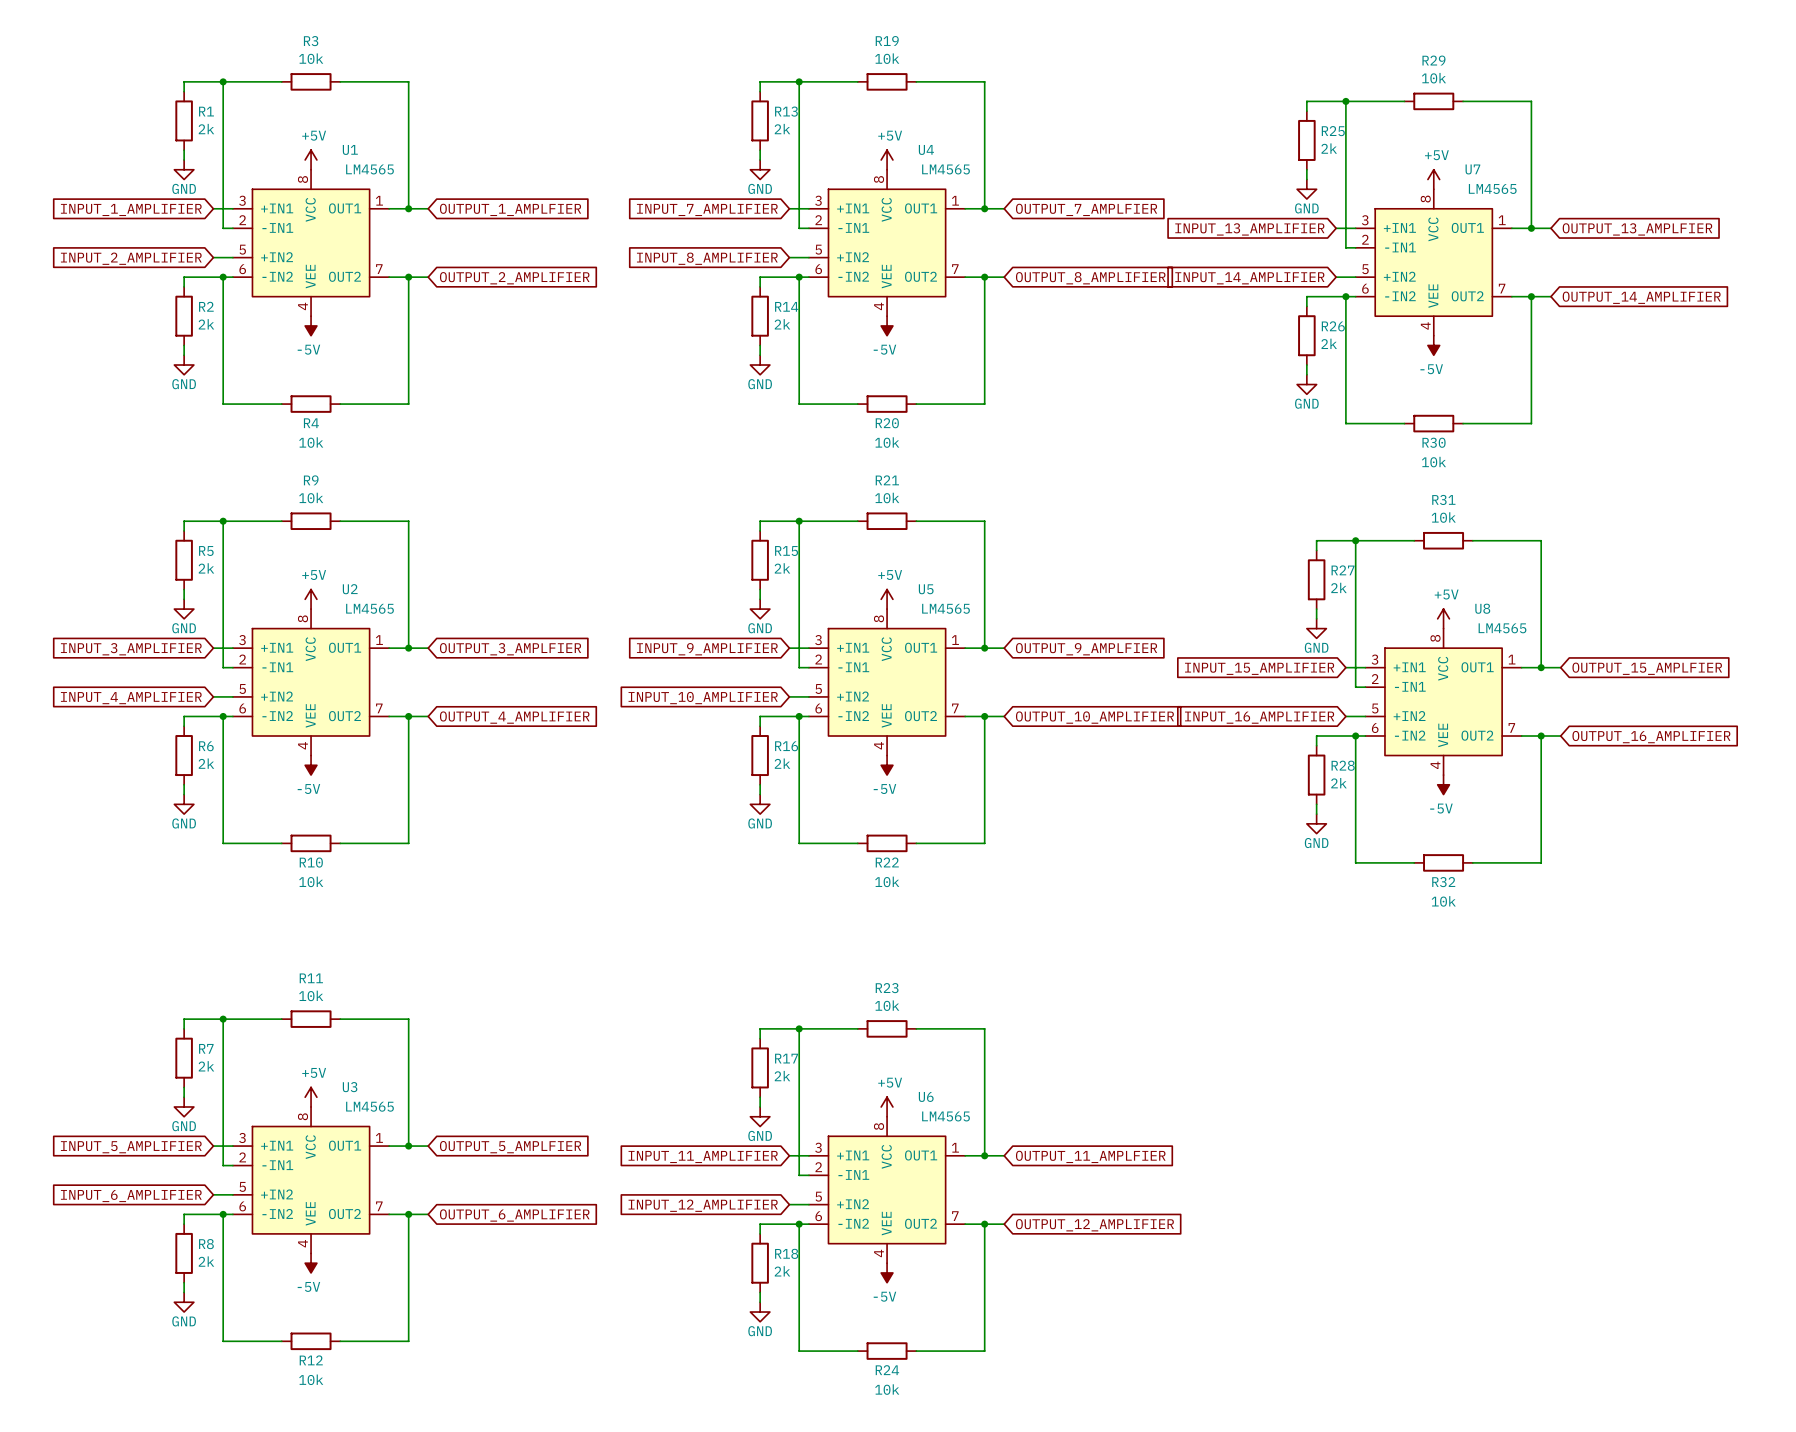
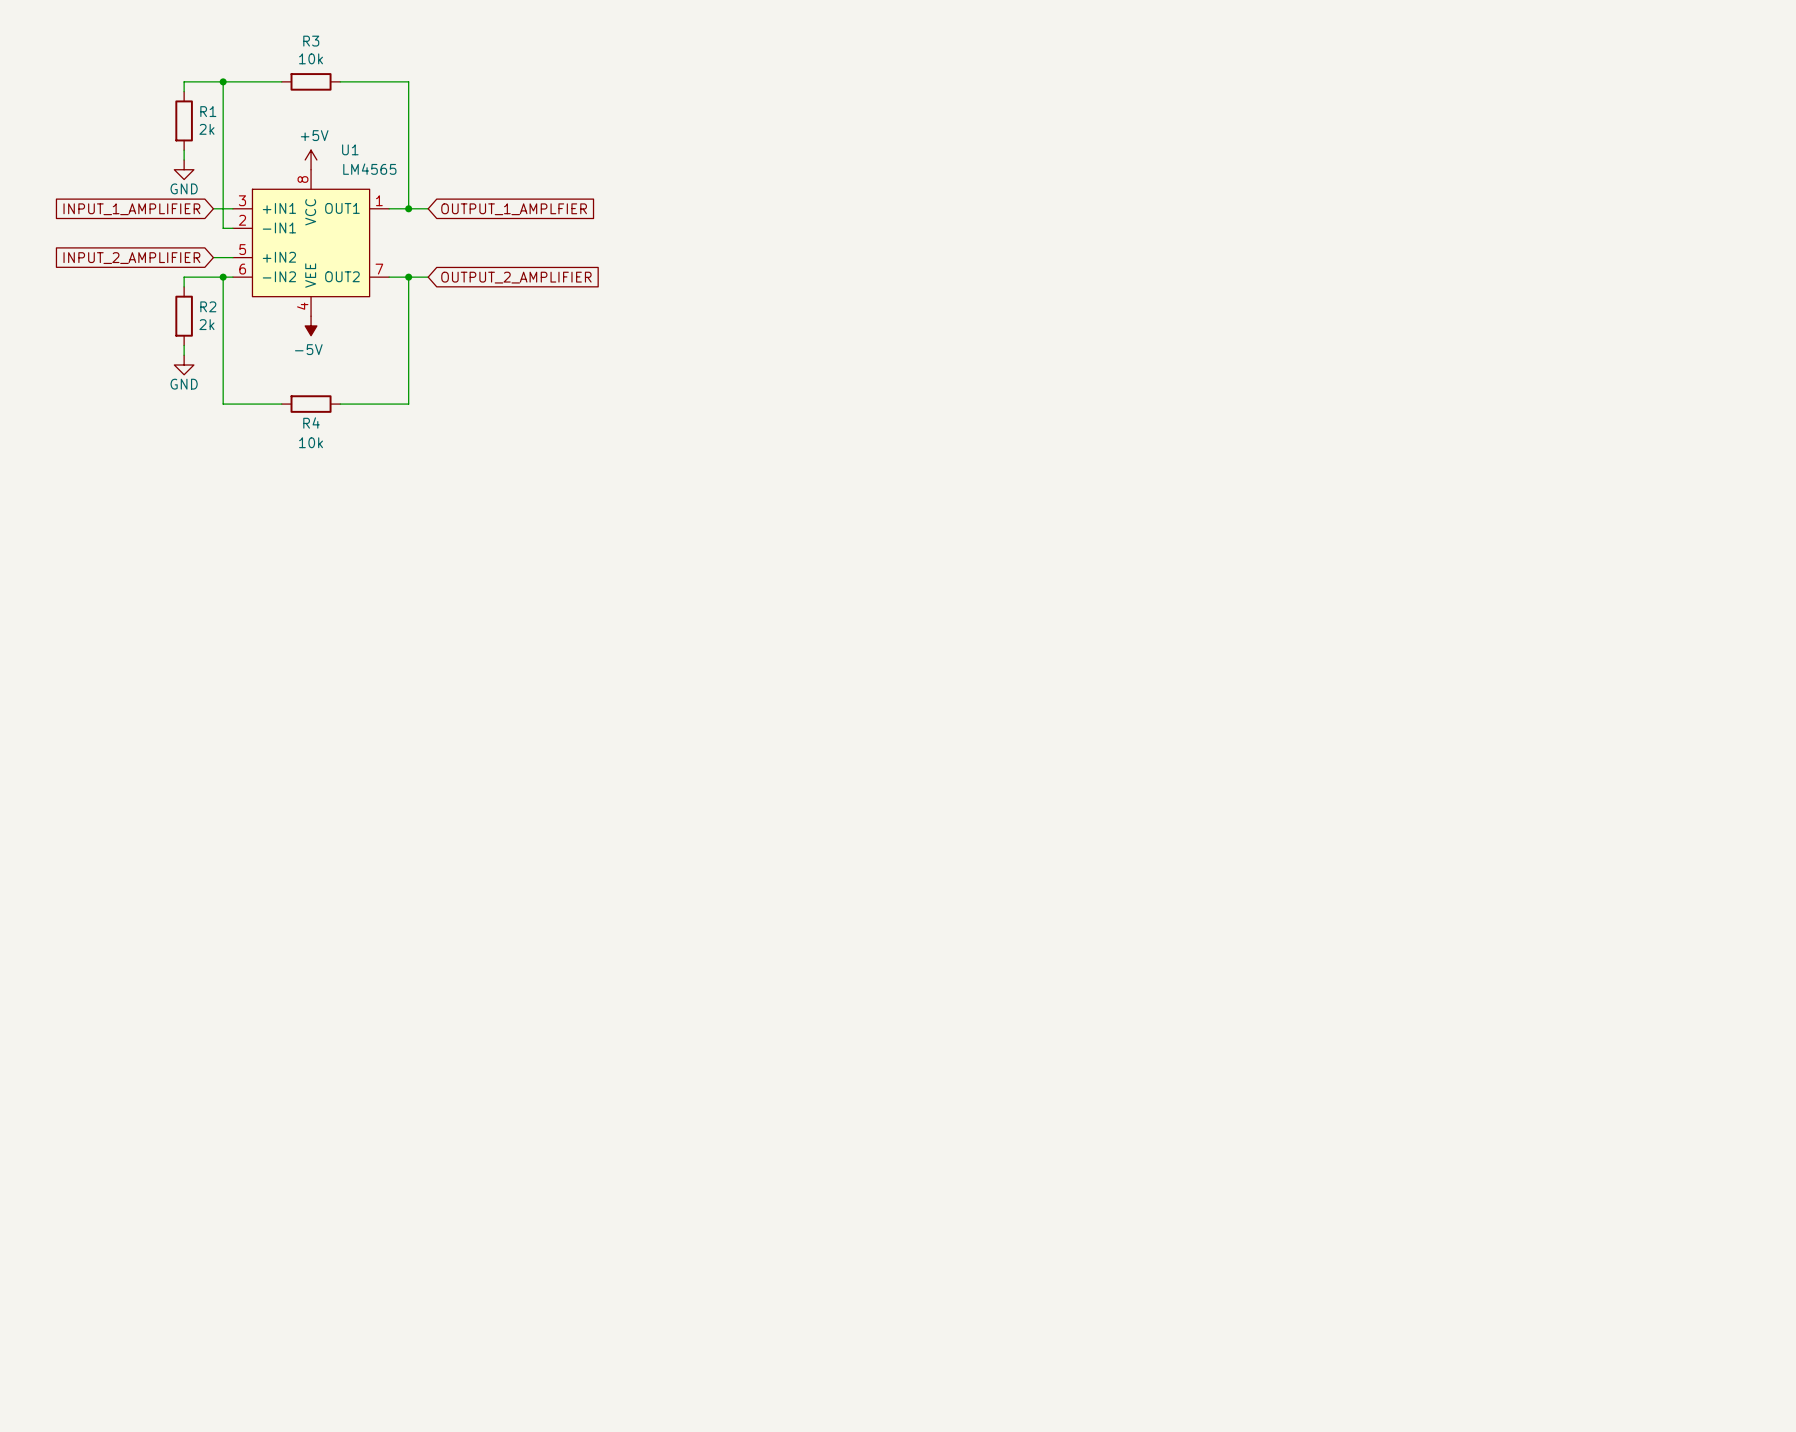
wire: (799, 81) (799, 228) (808, 228) -> none
junction: (799, 81) -> none
wire: (857, 81) (760, 81) (760, 91) -> none
R19: 10k (887, 81) -> none
wire: (916, 81) (984, 81) (984, 208) -> none
wire: (1345, 101) (1345, 247) (1355, 247) -> none
junction: (1345, 101) -> none
wire: (1404, 101) (1306, 101) (1306, 111) -> none
R29: 10k (1433, 101) -> none
wire: (1463, 101) (1531, 101) (1531, 228) -> none
R13: 2k (760, 120) -> none
R25: 2k (1306, 140) -> none
wire: (760, 150) (760, 159) -> none
power symbol: +5V (887, 159) -> none
power symbol: GND (760, 169) -> none
wire: (1306, 169) (1306, 179) -> none
power symbol: +5V (1433, 179) -> none
power symbol: GND (1306, 189) -> none
wire: (789, 208) (808, 208) -> none
wire: (965, 208) (1004, 208) -> none
junction: (984, 208) -> none
global label: INPUT_7_AMPLIFIER (707, 209) -> none
global label: OUTPUT_7_AMPLFIER (1086, 209) -> none
wire: (1336, 228) (1355, 228) -> none
wire: (1511, 228) (1550, 228) -> none
junction: (1531, 228) -> none
global label: INPUT_13_AMPLIFIER (1249, 229) -> none
global label: OUTPUT_13_AMPLFIER (1637, 229) -> none
U4: LM4565 (887, 242) -> none
wire: (789, 257) (808, 257) -> none
global label: INPUT_8_AMPLIFIER (707, 258) -> none
U7: LM4565 (1433, 262) -> none
wire: (799, 277) (799, 404) (857, 404) -> none
junction: (799, 277) -> none
wire: (808, 277) (760, 277) (760, 286) -> none
wire: (965, 277) (1004, 277) -> none
wire: (984, 277) (984, 404) (916, 404) -> none
junction: (984, 277) -> none
wire: (1336, 277) (1355, 277) -> none
global label: OUTPUT_8_AMPLIFIER (1090, 278) -> none
global label: INPUT_14_AMPLIFIER (1249, 278) -> none
wire: (1345, 296) (1345, 423) (1404, 423) -> none
junction: (1345, 296) -> none
wire: (1355, 296) (1306, 296) (1306, 306) -> none
wire: (1511, 296) (1550, 296) -> none
wire: (1531, 296) (1531, 423) (1463, 423) -> none
junction: (1531, 296) -> none
global label: OUTPUT_14_AMPLIFIER (1641, 297) -> none
R14: 2k (760, 316) -> none
power symbol: -5V (887, 325) -> none
R26: 2k (1306, 335) -> none
wire: (760, 345) (760, 355) -> none
power symbol: -5V (1433, 345) -> none
power symbol: GND (760, 365) -> none
wire: (1306, 365) (1306, 374) -> none
power symbol: GND (1306, 384) -> none
R20: 10k (887, 404) -> none
R30: 10k (1433, 423) -> none
wire: (223, 521) (223, 667) (232, 667) -> none
junction: (223, 521) -> none
wire: (281, 521) (184, 521) (184, 530) -> none
R9: 10k (311, 521) -> none
wire: (340, 521) (408, 521) (408, 648) -> none
wire: (799, 521) (799, 667) (808, 667) -> none
junction: (799, 521) -> none
wire: (857, 521) (760, 521) (760, 530) -> none
R21: 10k (887, 521) -> none
wire: (916, 521) (984, 521) (984, 648) -> none
wire: (1355, 540) (1355, 687) (1365, 687) -> none
junction: (1355, 540) -> none
wire: (1414, 540) (1316, 540) (1316, 550) -> none
R31: 10k (1443, 540) -> none
wire: (1472, 540) (1541, 540) (1541, 667) -> none
R5: 2k (184, 560) -> none
R15: 2k (760, 560) -> none
R27: 2k (1316, 579) -> none
wire: (184, 589) (184, 599) -> none
wire: (760, 589) (760, 599) -> none
power symbol: +5V (311, 599) -> none
power symbol: +5V (887, 599) -> none
power symbol: GND (184, 609) -> none
power symbol: GND (760, 609) -> none
wire: (1316, 609) (1316, 618) -> none
power symbol: +5V (1443, 618) -> none
power symbol: GND (1316, 628) -> none
wire: (213, 648) (232, 648) -> none
wire: (389, 648) (428, 648) -> none
junction: (408, 648) -> none
wire: (789, 648) (808, 648) -> none
wire: (965, 648) (1004, 648) -> none
junction: (984, 648) -> none
global label: INPUT_3_AMPLIFIER (131, 649) -> none
global label: OUTPUT_3_AMPLFIER (510, 649) -> none
global label: INPUT_9_AMPLIFIER (707, 649) -> none
global label: OUTPUT_9_AMPLFIER (1086, 649) -> none
wire: (1345, 667) (1365, 667) -> none
wire: (1521, 667) (1560, 667) -> none
junction: (1541, 667) -> none
global label: INPUT_15_AMPLIFIER (1259, 668) -> none
global label: OUTPUT_15_AMPLFIER (1647, 668) -> none
U2: LM4565 (311, 682) -> none
U5: LM4565 (887, 682) -> none
wire: (213, 696) (232, 696) -> none
wire: (789, 696) (808, 696) -> none
global label: INPUT_4_AMPLIFIER (131, 698) -> none
global label: INPUT_10_AMPLIFIER (703, 698) -> none
U8: LM4565 (1443, 701) -> none
wire: (223, 716) (223, 843) (281, 843) -> none
junction: (223, 716) -> none
wire: (232, 716) (184, 716) (184, 726) -> none
wire: (389, 716) (428, 716) -> none
wire: (408, 716) (408, 843) (340, 843) -> none
junction: (408, 716) -> none
wire: (799, 716) (799, 843) (857, 843) -> none
junction: (799, 716) -> none
wire: (808, 716) (760, 716) (760, 726) -> none
wire: (965, 716) (1004, 716) -> none
wire: (984, 716) (984, 843) (916, 843) -> none
junction: (984, 716) -> none
wire: (1345, 716) (1365, 716) -> none
global label: OUTPUT_4_AMPLIFIER (514, 717) -> none
global label: OUTPUT_10_AMPLIFIER (1094, 717) -> none
global label: INPUT_16_AMPLIFIER (1259, 717) -> none
wire: (1355, 736) (1355, 862) (1414, 862) -> none
junction: (1355, 736) -> none
wire: (1365, 736) (1316, 736) (1316, 745) -> none
wire: (1521, 736) (1560, 736) -> none
wire: (1541, 736) (1541, 862) (1472, 862) -> none
junction: (1541, 736) -> none
global label: OUTPUT_16_AMPLIFIER (1651, 737) -> none
R6: 2k (184, 755) -> none
R16: 2k (760, 755) -> none
power symbol: -5V (311, 765) -> none
power symbol: -5V (887, 765) -> none
R28: 2k (1316, 775) -> none
wire: (184, 784) (184, 794) -> none
wire: (760, 784) (760, 794) -> none
power symbol: -5V (1443, 784) -> none
power symbol: GND (184, 804) -> none
power symbol: GND (760, 804) -> none
wire: (1316, 804) (1316, 814) -> none
power symbol: GND (1316, 823) -> none
R10: 10k (311, 843) -> none
R22: 10k (887, 843) -> none
R32: 10k (1443, 862) -> none
wire: (223, 1019) (223, 1165) (232, 1165) -> none
junction: (223, 1019) -> none
wire: (281, 1019) (184, 1019) (184, 1028) -> none
R11: 10k (311, 1019) -> none
wire: (340, 1019) (408, 1019) (408, 1146) -> none
wire: (799, 1028) (799, 1175) (808, 1175) -> none
junction: (799, 1028) -> none
wire: (857, 1028) (760, 1028) (760, 1038) -> none
R23: 10k (887, 1028) -> none
wire: (916, 1028) (984, 1028) (984, 1155) -> none
R7: 2k (184, 1058) -> none
R17: 2k (760, 1067) -> none
wire: (184, 1087) (184, 1097) -> none
power symbol: +5V (311, 1097) -> none
wire: (760, 1097) (760, 1106) -> none
power symbol: GND (184, 1106) -> none
power symbol: +5V (887, 1106) -> none
power symbol: GND (760, 1116) -> none
wire: (213, 1146) (232, 1146) -> none
wire: (389, 1146) (428, 1146) -> none
junction: (408, 1146) -> none
global label: INPUT_5_AMPLIFIER (131, 1147) -> none
global label: OUTPUT_5_AMPLFIER (510, 1147) -> none
wire: (789, 1155) (808, 1155) -> none
wire: (965, 1155) (1004, 1155) -> none
junction: (984, 1155) -> none
global label: INPUT_11_AMPLIFIER (703, 1156) -> none
global label: OUTPUT_11_AMPLFIER (1090, 1156) -> none
U3: LM4565 (311, 1180) -> none
U6: LM4565 (887, 1189) -> none
wire: (213, 1194) (232, 1194) -> none
global label: INPUT_6_AMPLIFIER (131, 1196) -> none
wire: (789, 1204) (808, 1204) -> none
global label: INPUT_12_AMPLIFIER (703, 1205) -> none
wire: (223, 1214) (223, 1341) (281, 1341) -> none
junction: (223, 1214) -> none
wire: (232, 1214) (184, 1214) (184, 1224) -> none
wire: (389, 1214) (428, 1214) -> none
wire: (408, 1214) (408, 1341) (340, 1341) -> none
junction: (408, 1214) -> none
global label: OUTPUT_6_AMPLIFIER (514, 1215) -> none
wire: (799, 1224) (799, 1351) (857, 1351) -> none
junction: (799, 1224) -> none
wire: (808, 1224) (760, 1224) (760, 1233) -> none
wire: (965, 1224) (1004, 1224) -> none
wire: (984, 1224) (984, 1351) (916, 1351) -> none
junction: (984, 1224) -> none
global label: OUTPUT_12_AMPLIFIER (1094, 1225) -> none
R8: 2k (184, 1253) -> none
power symbol: -5V (311, 1263) -> none
R18: 2k (760, 1263) -> none
power symbol: -5V (887, 1272) -> none
wire: (184, 1282) (184, 1292) -> none
wire: (760, 1292) (760, 1302) -> none
power symbol: GND (184, 1302) -> none
power symbol: GND (760, 1312) -> none
R12: 10k (311, 1341) -> none
R24: 10k (887, 1351) -> none

